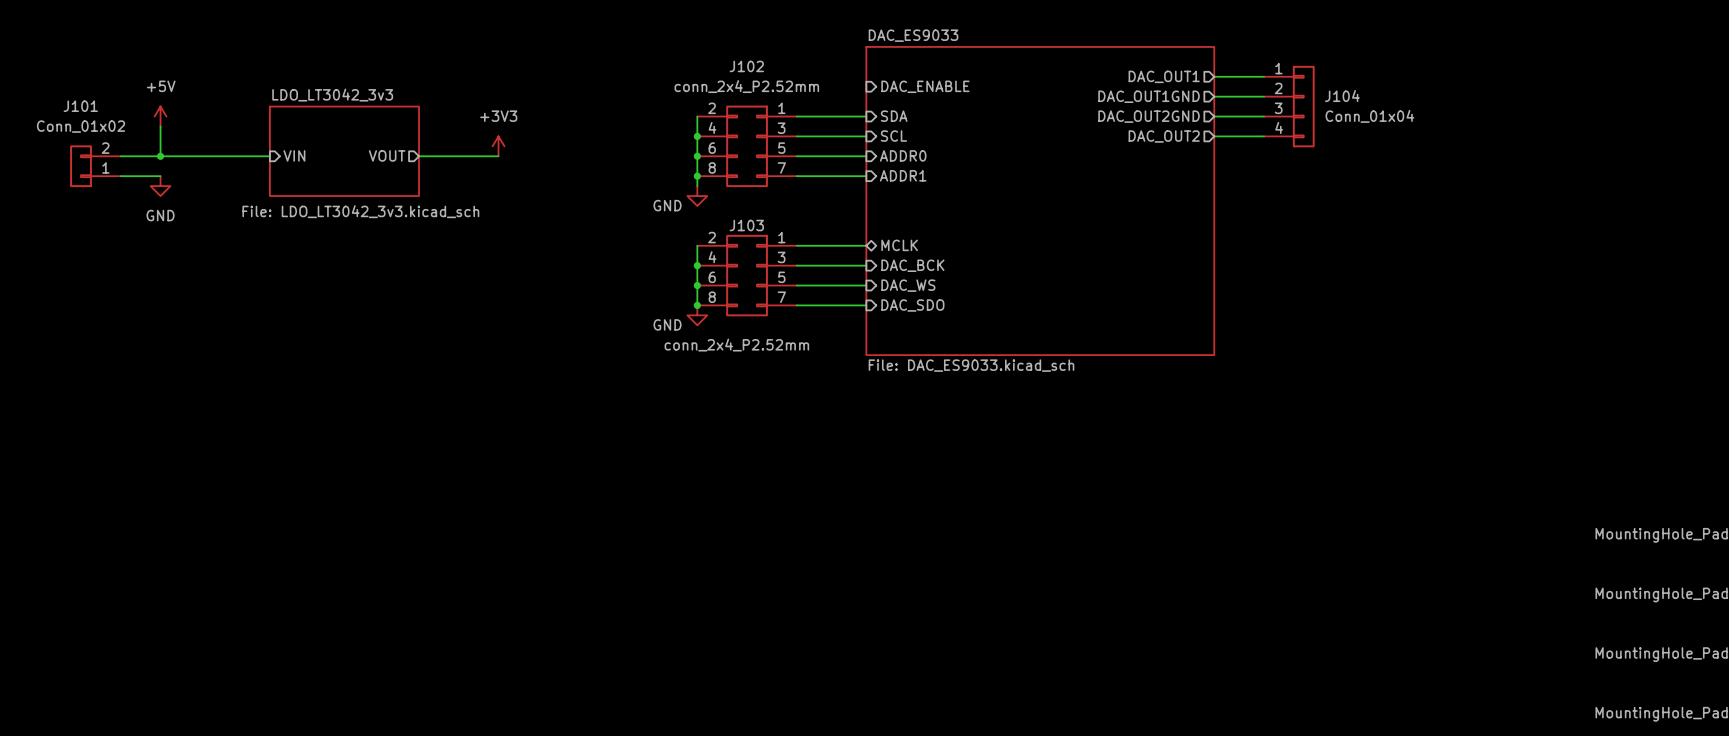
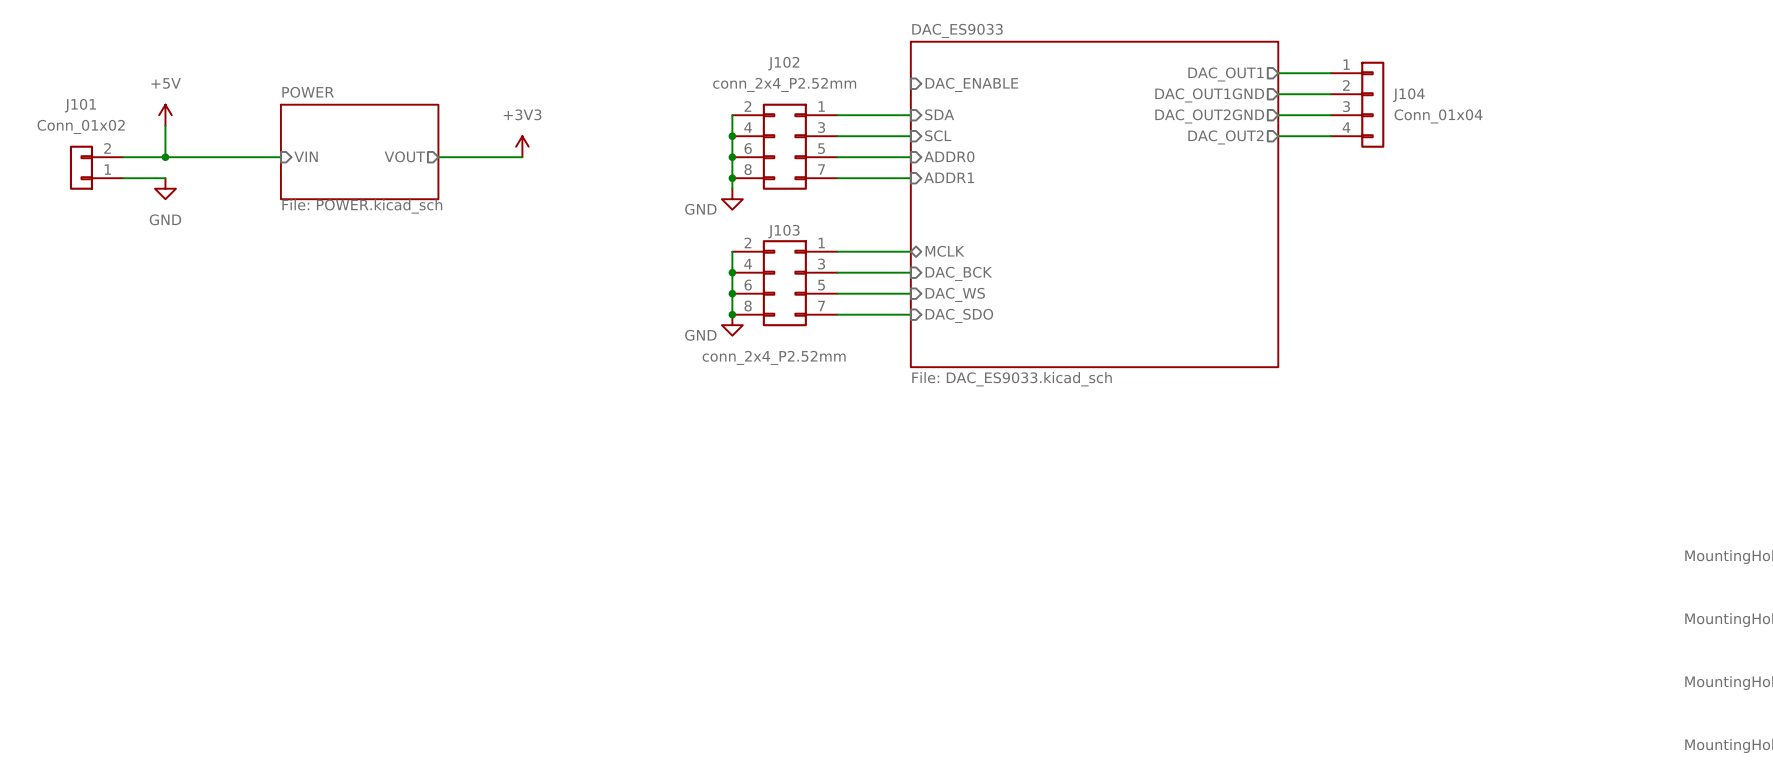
sheet LDO_LT3042_3v3 name: LDO_LT3042_3v3 (332, 95) -> POWER (308, 92)
sheet LDO_LT3042_3v3 value: File: LDO_LT3042_3v3.kicad_sch (360, 211) -> File: POWER.kicad_sch (362, 206)

